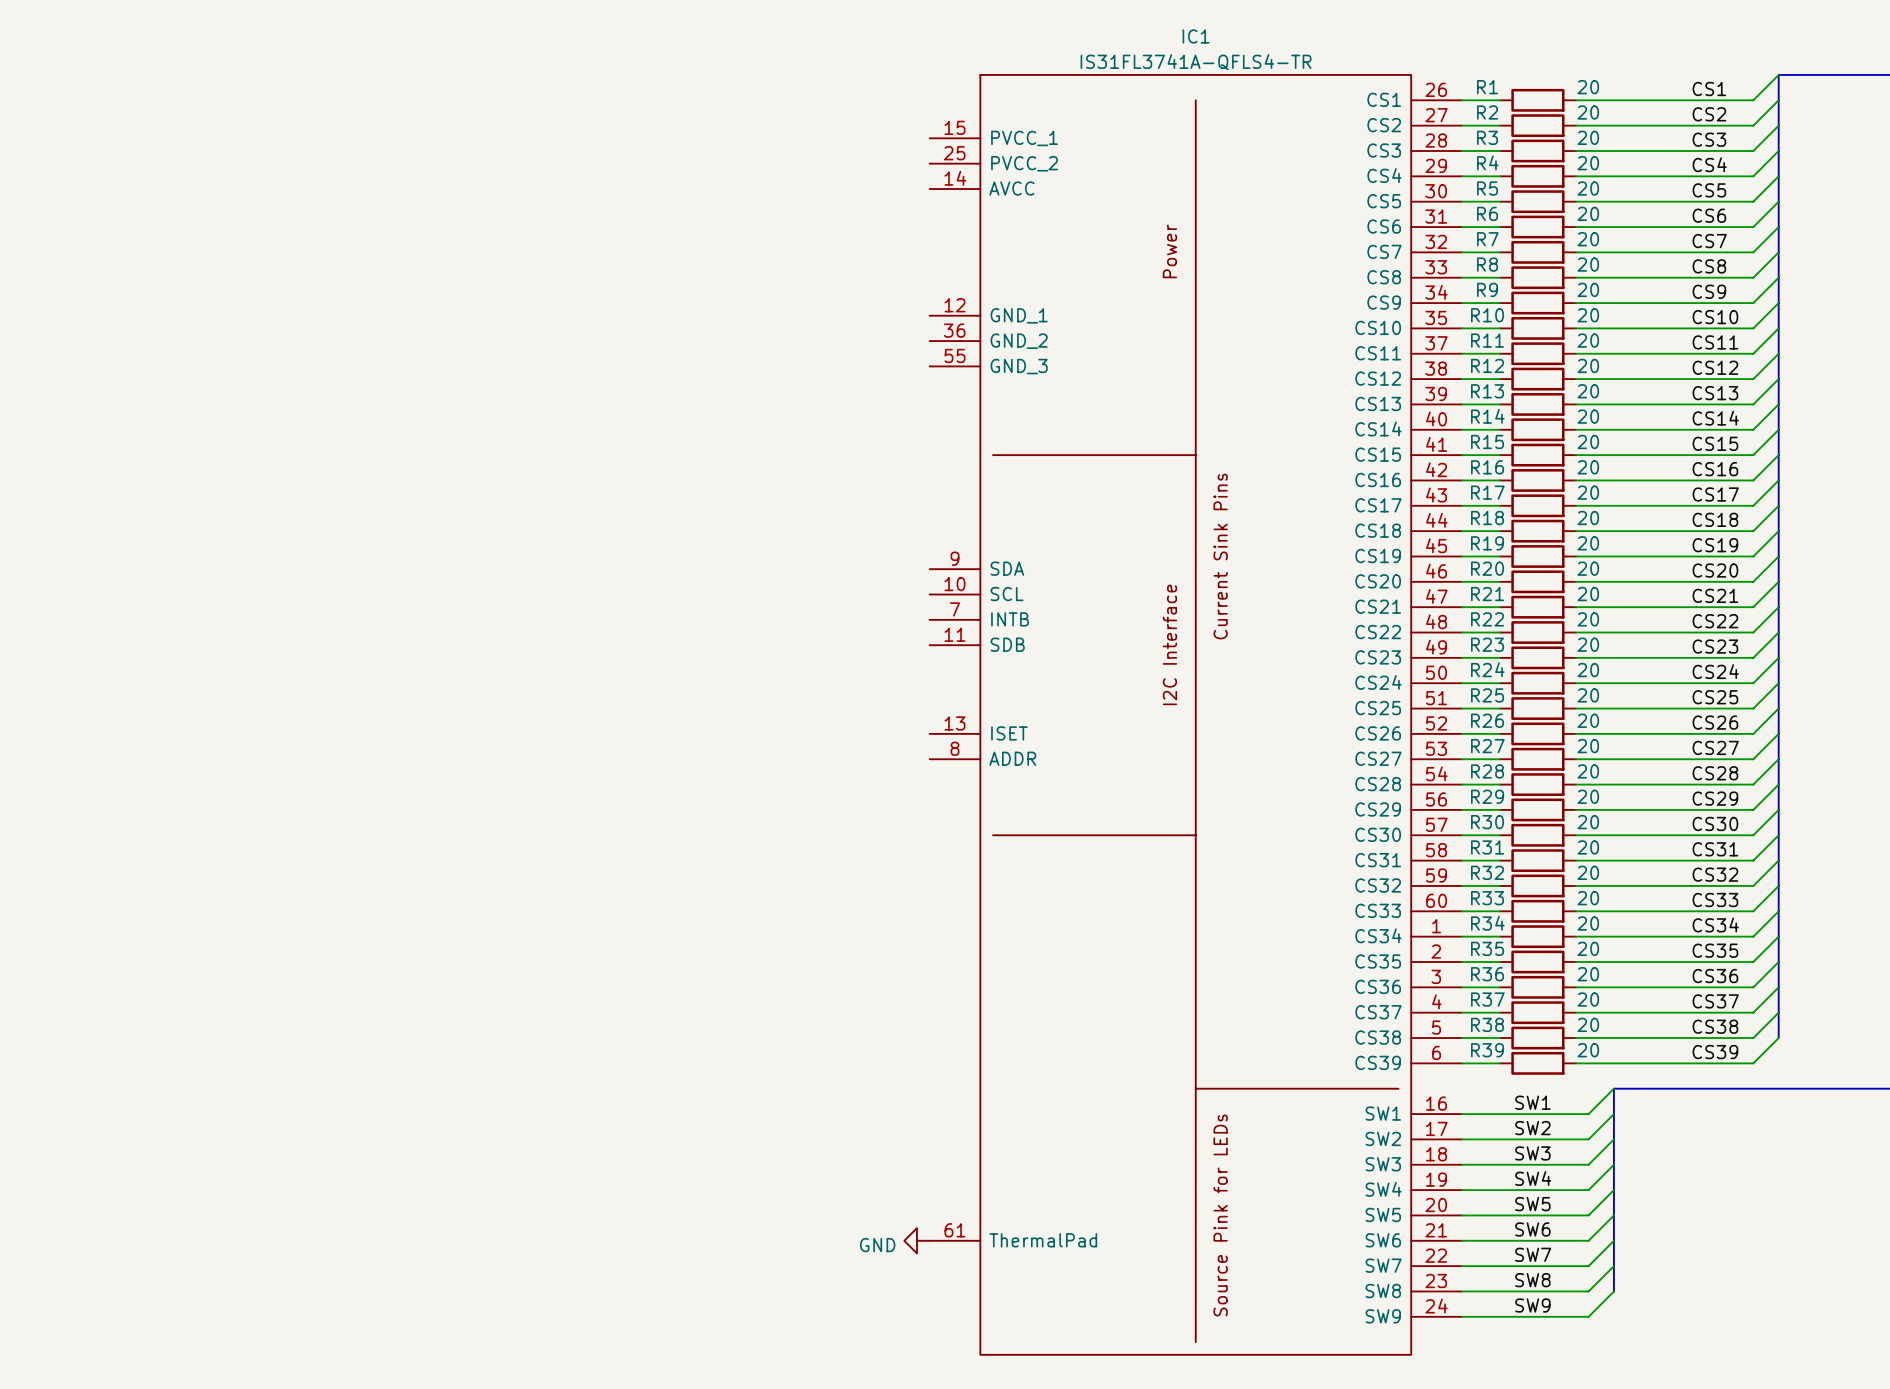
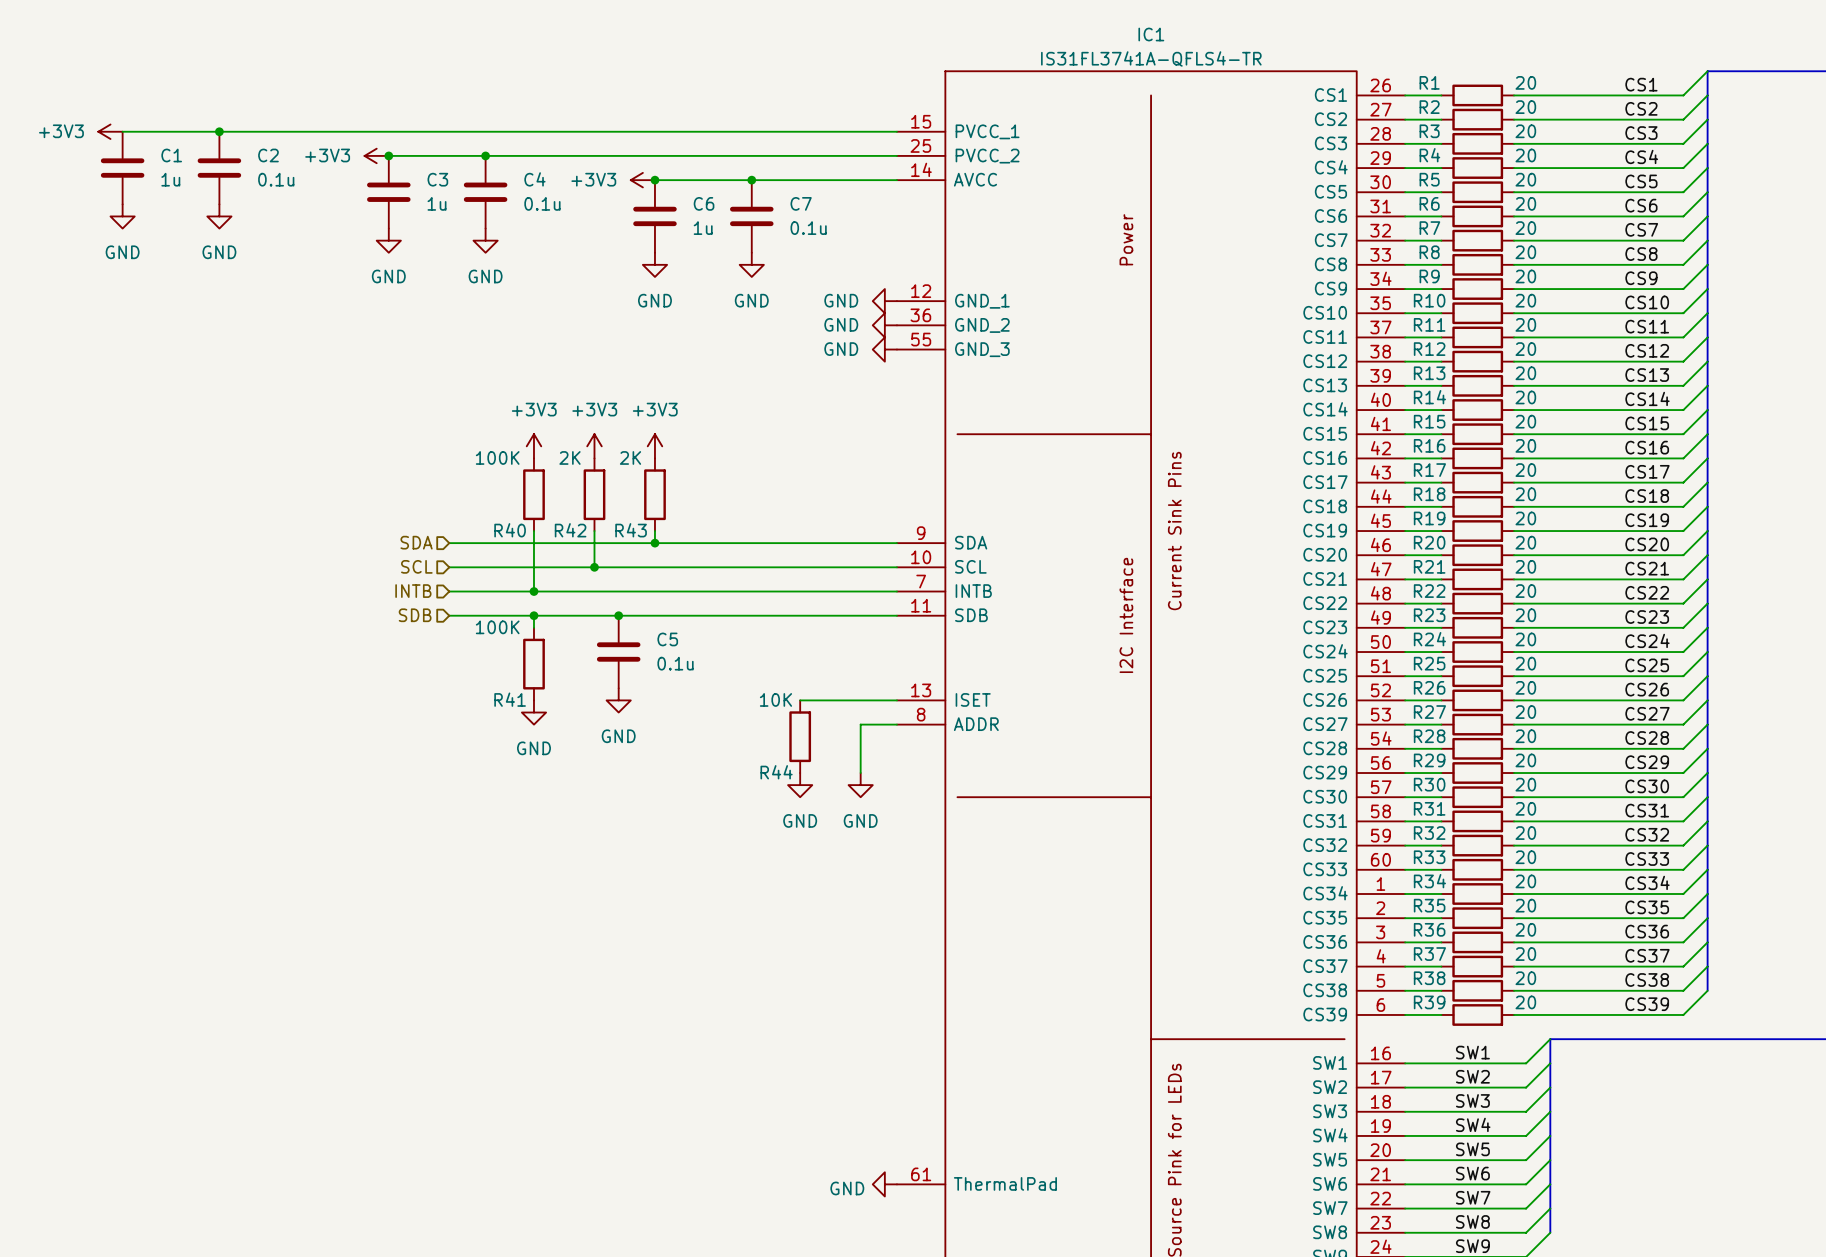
power symbol: none -> +3V3 (110, 131)
wire: none -> (122, 131) (896, 131)
junction: none -> (219, 131)
power symbol: none -> +3V3 (376, 155)
wire: none -> (388, 155) (896, 155)
junction: none -> (388, 155)
junction: none -> (485, 155)
C1: none -> 1u (122, 168)
C2: none -> 0.1u (219, 168)
power symbol: none -> +3V3 (642, 180)
wire: none -> (654, 180) (896, 180)
junction: none -> (654, 180)
junction: none -> (751, 180)
C3: none -> 1u (388, 192)
C4: none -> 0.1u (485, 192)
power symbol: none -> GND (122, 216)
power symbol: none -> GND (219, 216)
C6: none -> 1u (654, 216)
C7: none -> 0.1u (751, 216)
power symbol: none -> GND (388, 240)
power symbol: none -> GND (485, 240)
power symbol: none -> GND (654, 264)
power symbol: none -> GND (751, 264)
power symbol: none -> GND (884, 301)
power symbol: none -> GND (884, 325)
power symbol: none -> GND (884, 349)
power symbol: none -> +3V3 (533, 446)
power symbol: none -> +3V3 (594, 446)
power symbol: none -> +3V3 (654, 446)
R40: none -> 100K (533, 494)
R42: none -> 2K (594, 494)
R43: none -> 2K (654, 494)
wire: none -> (533, 531) (533, 591)
wire: none -> (594, 531) (594, 567)
wire: none -> (654, 531) (654, 543)
hierarchical label: none -> SDA (416, 542)
wire: none -> (449, 543) (896, 543)
junction: none -> (654, 543)
hierarchical label: none -> SCL (416, 566)
wire: none -> (449, 567) (896, 567)
junction: none -> (594, 567)
hierarchical label: none -> INTB (413, 591)
wire: none -> (449, 591) (896, 591)
junction: none -> (533, 591)
hierarchical label: none -> SDB (415, 615)
wire: none -> (449, 615) (896, 615)
wire: none -> (533, 615) (533, 627)
junction: none -> (533, 615)
junction: none -> (618, 615)
C5: none -> 0.1u (618, 652)
R41: none -> 100K (533, 664)
power symbol: none -> GND (618, 700)
wire: none -> (800, 700) (896, 700)
power symbol: none -> GND (533, 712)
wire: none -> (896, 724) (860, 724) (860, 773)
R44: none -> 10K (800, 736)
power symbol: none -> GND (800, 785)
power symbol: none -> GND (860, 785)

